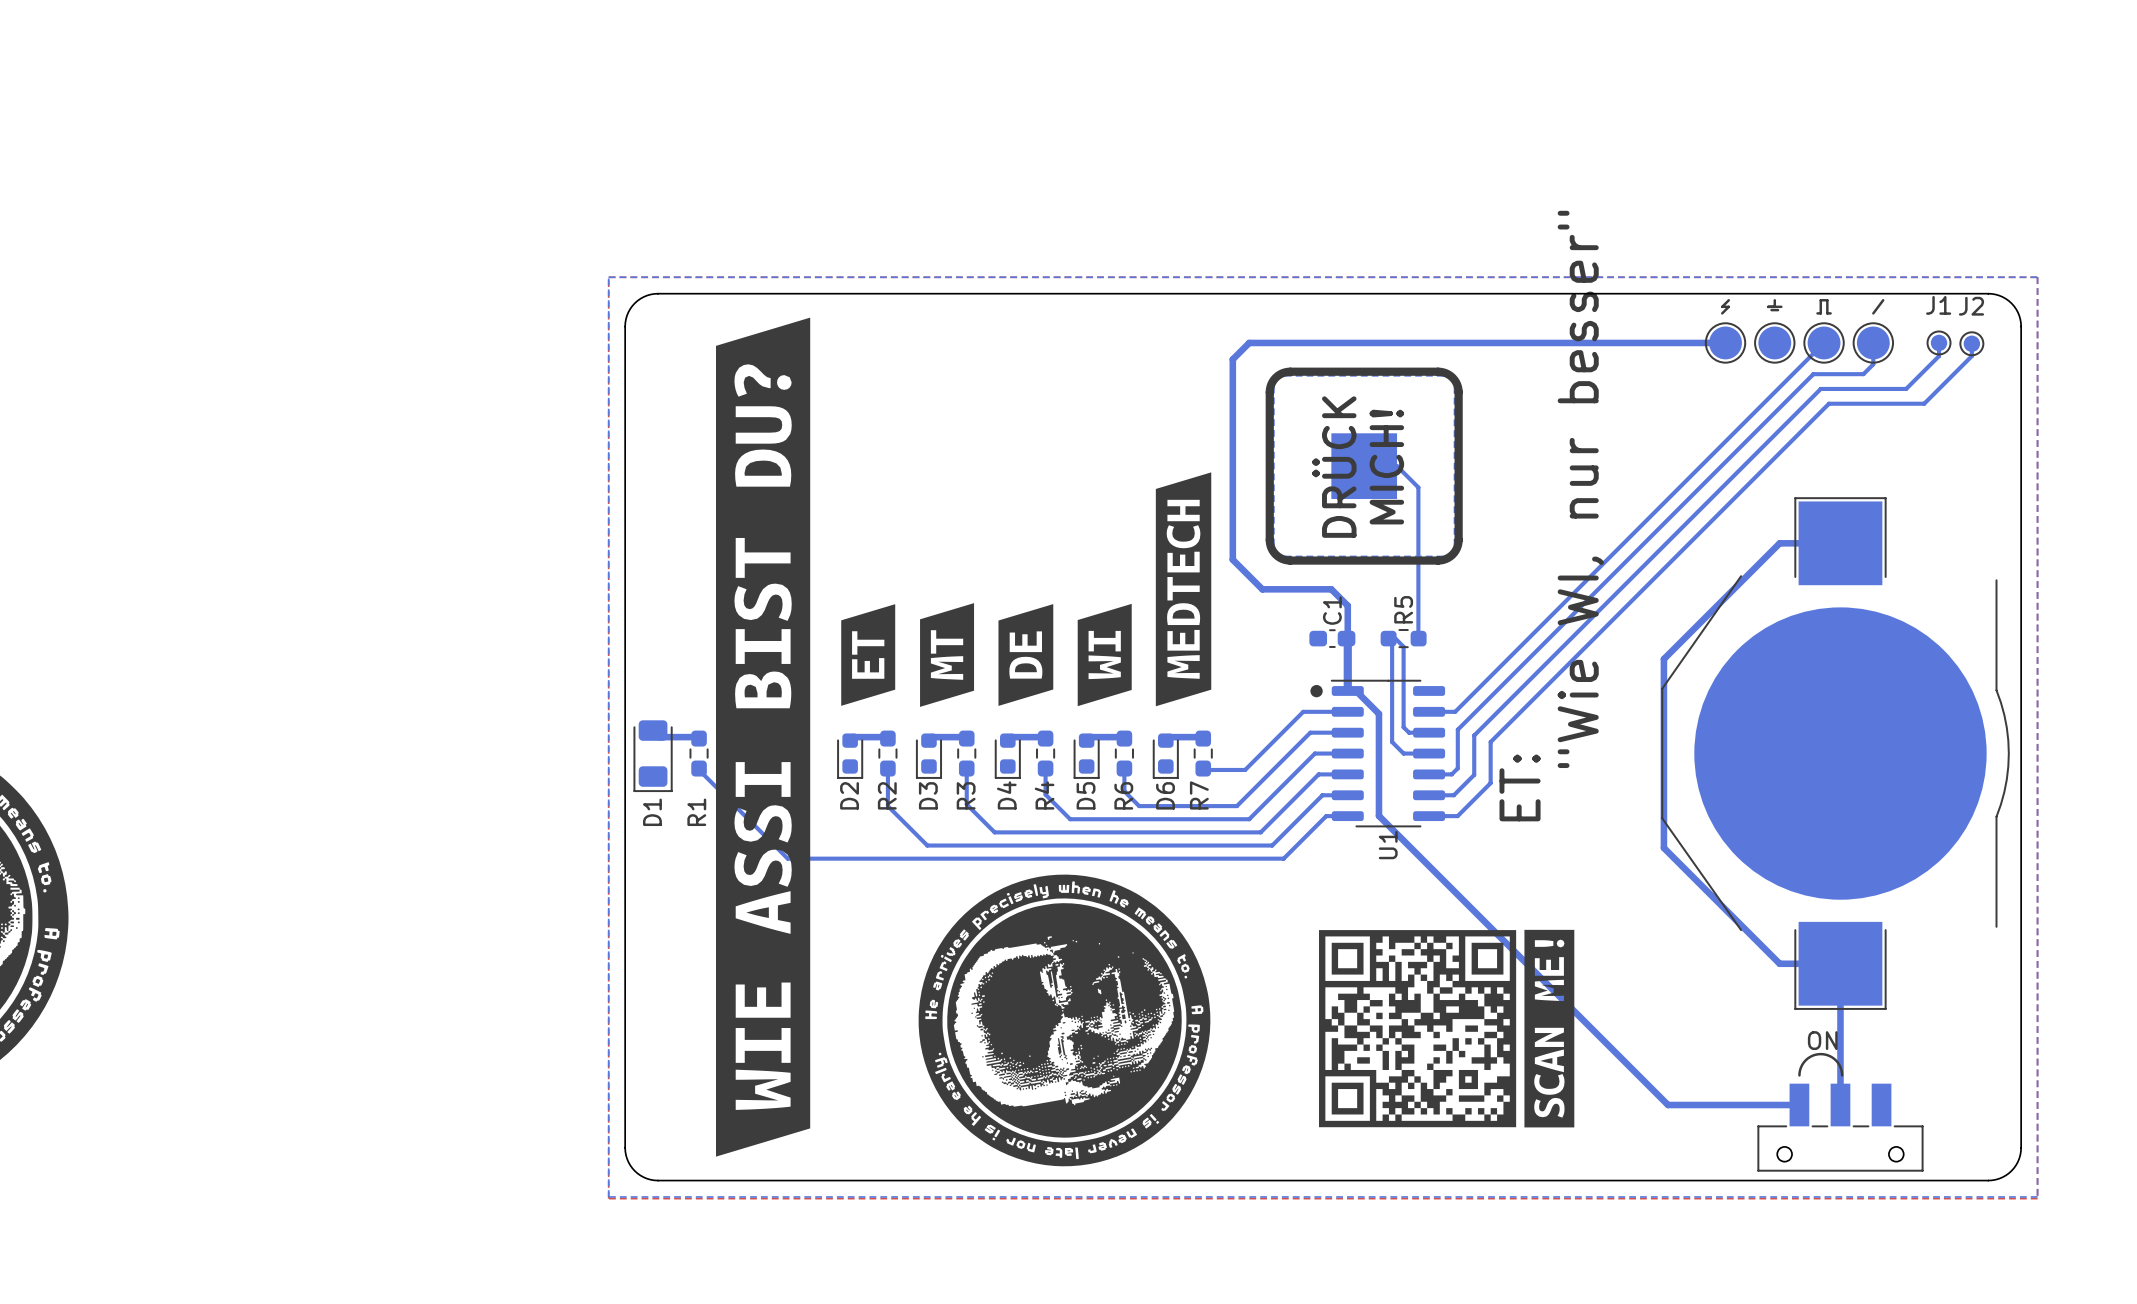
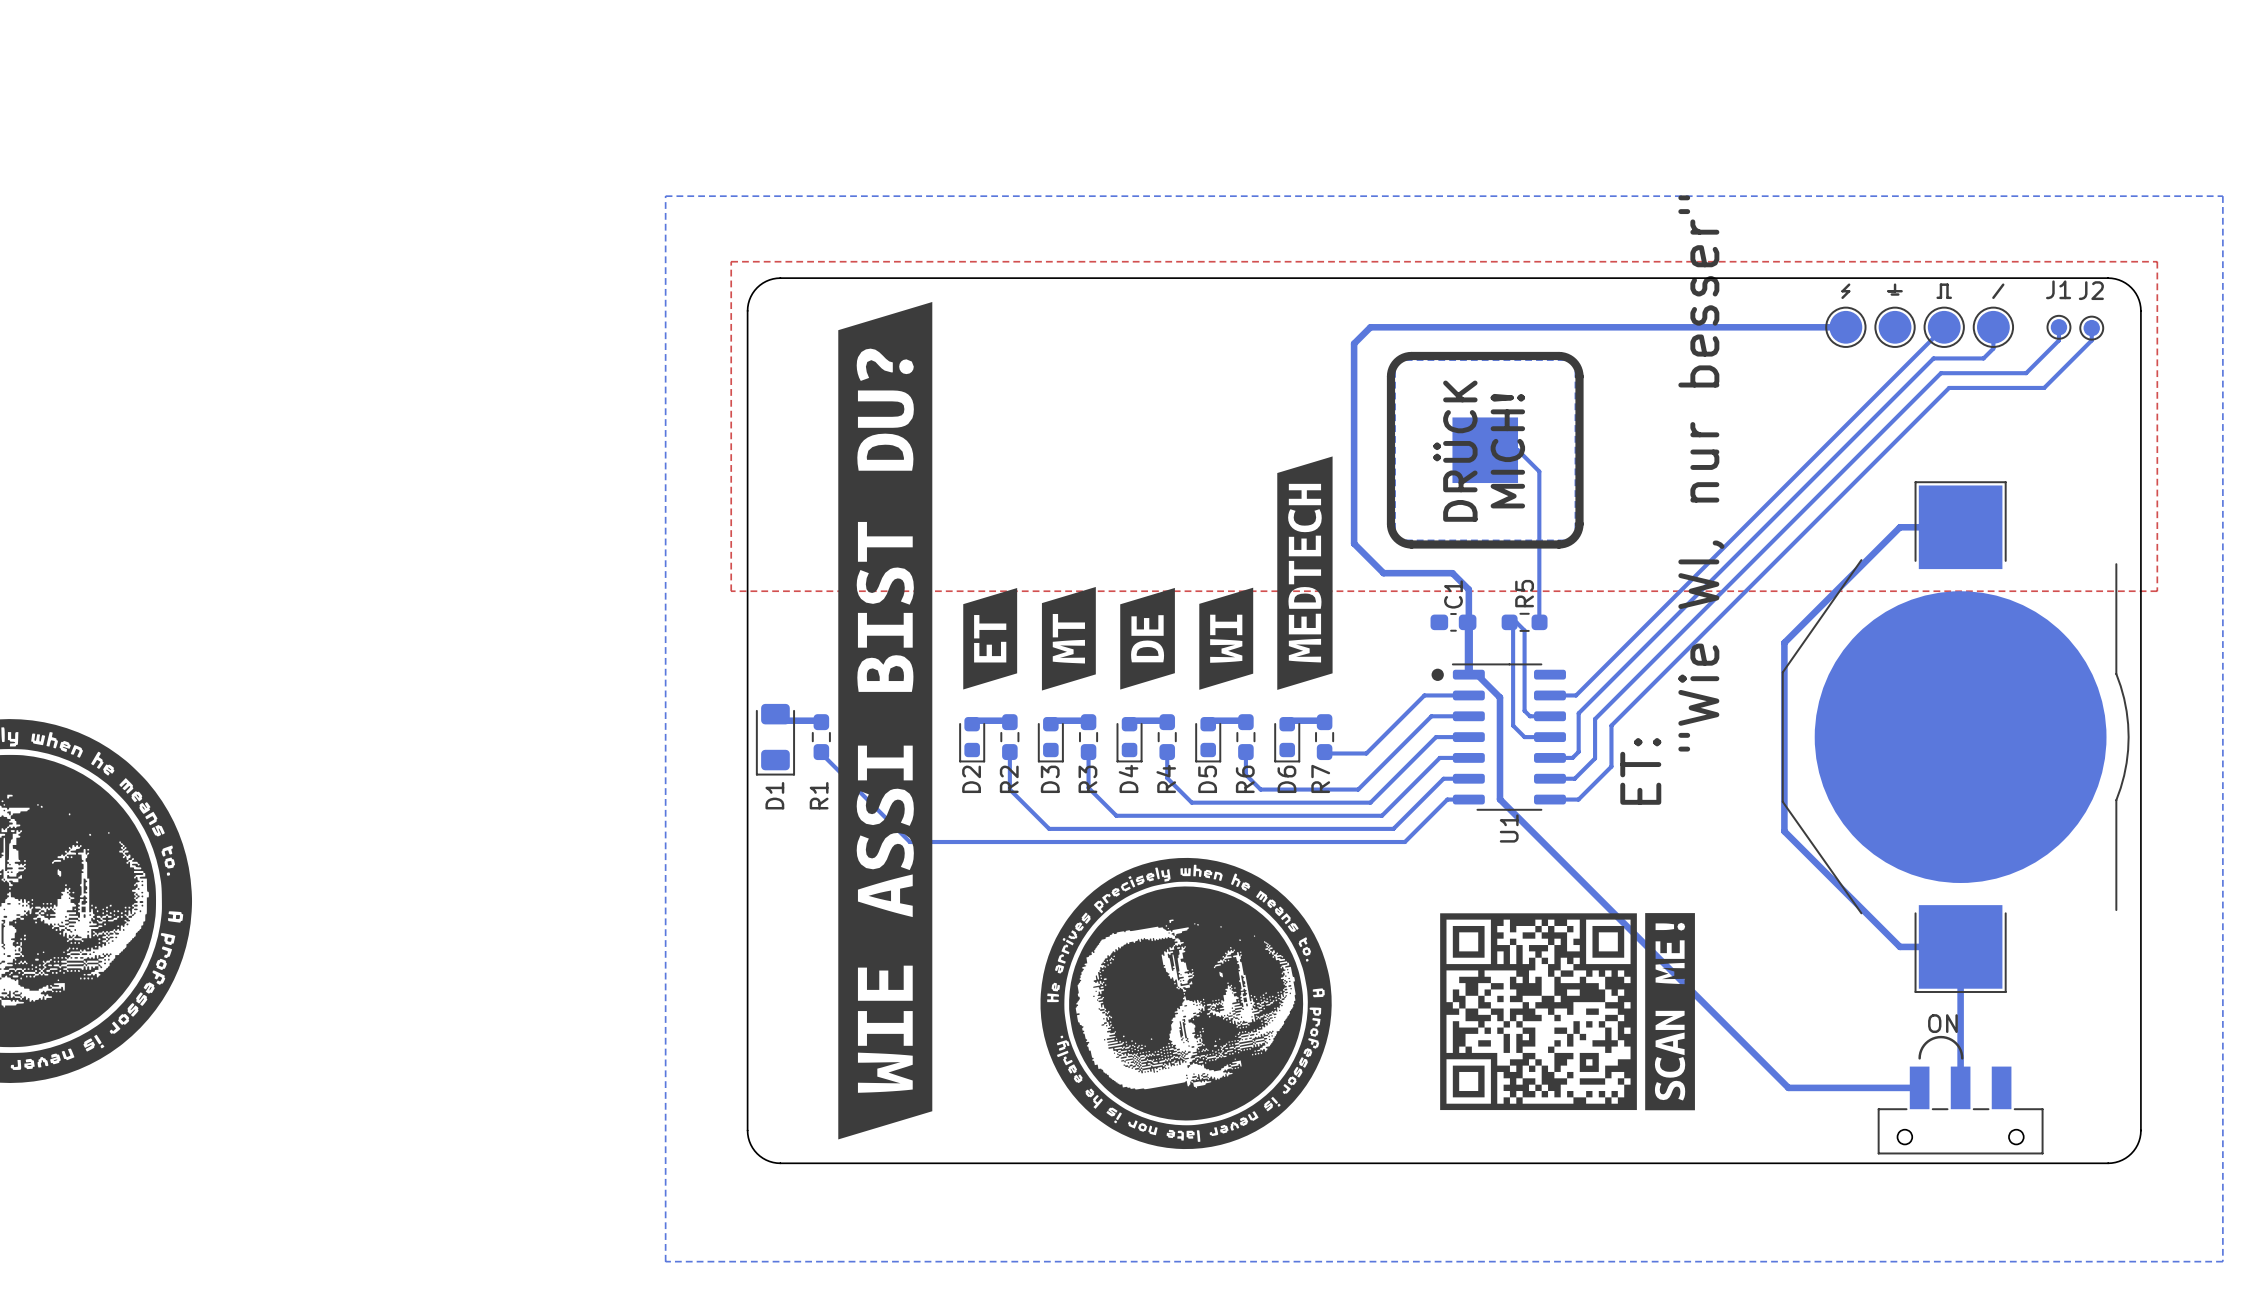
bottom zone outline: (2037, 277) (2037, 1196) (608, 1196) (608, 277) (2037, 277) -> (2222, 196) (2222, 1261) (665, 1261) (665, 196) (2222, 196)
top zone outline: (2037, 607) (2037, 1198) (608, 1198) (608, 607) -> (2157, 591) (731, 591)

